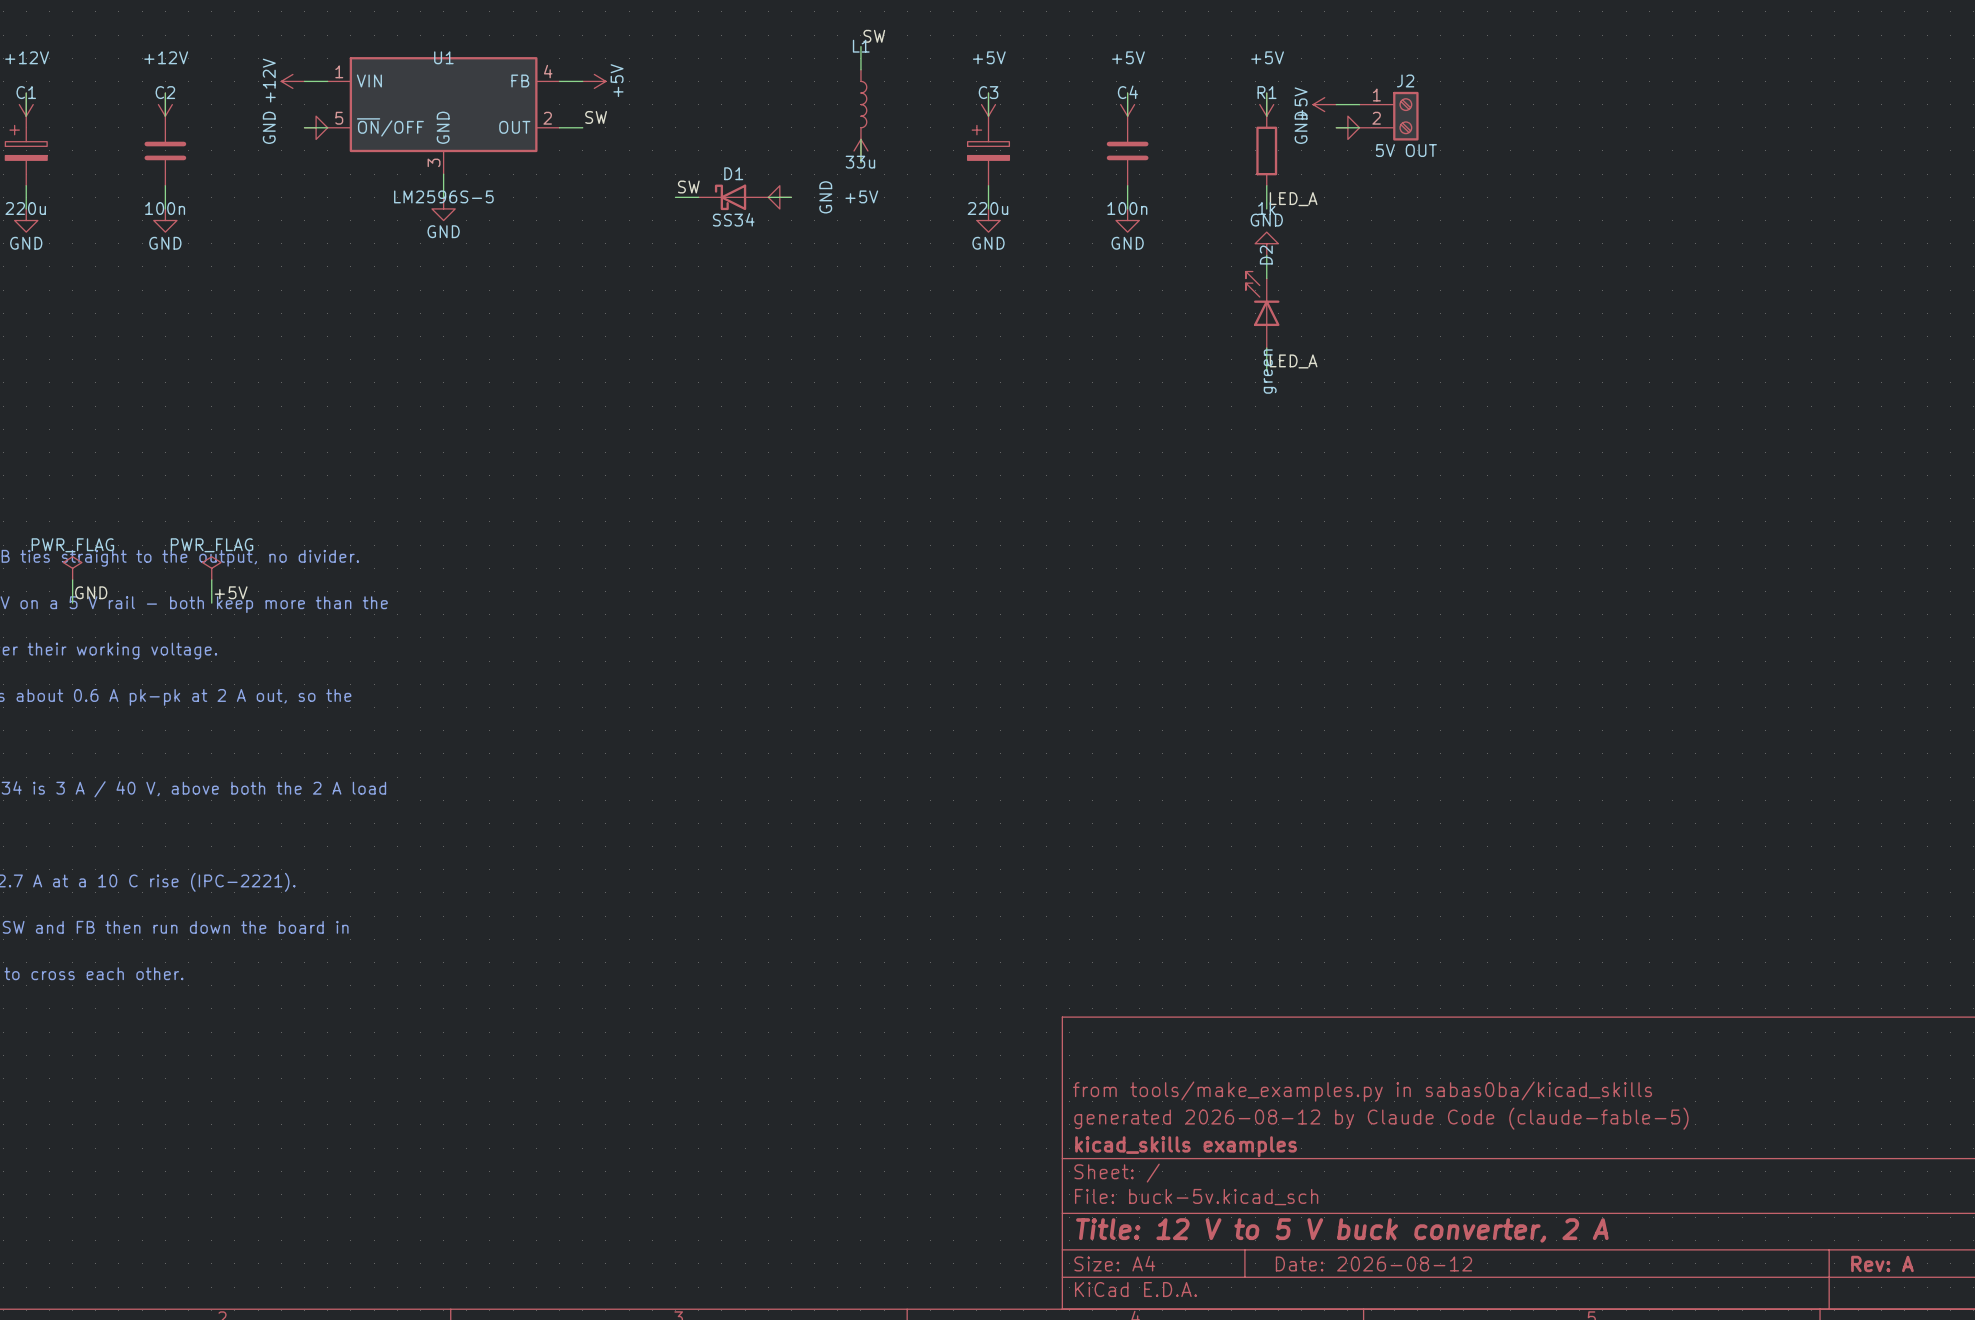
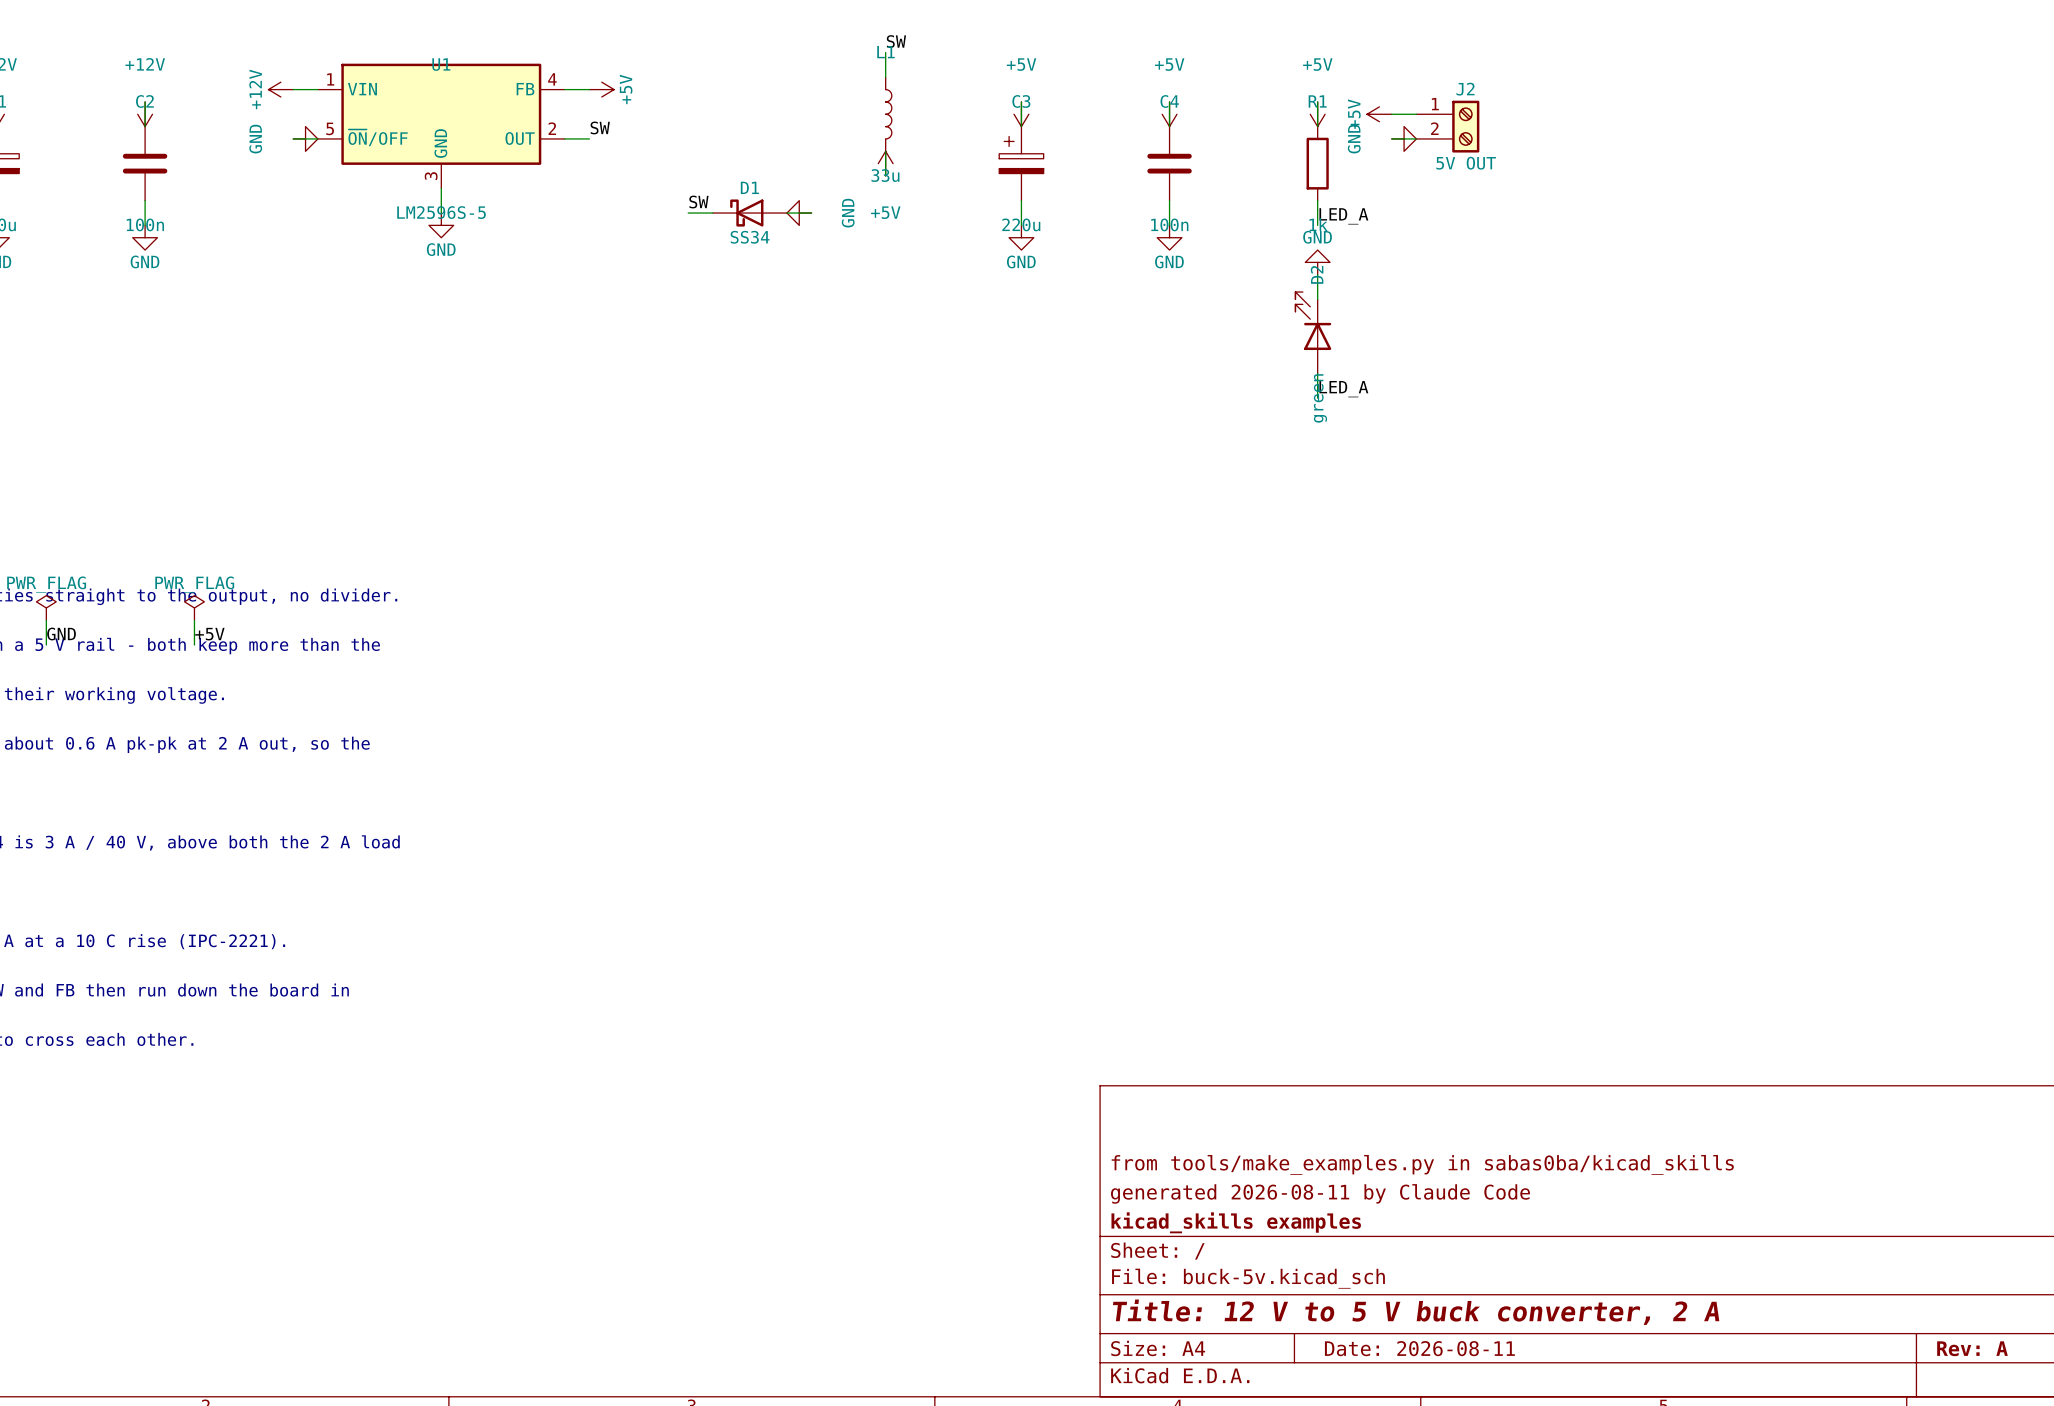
title block: generated 2026-08-12 by Claude Code (claude-fable-5) (1381, 1118) -> generated 2026-08-11 by Claude Code (1320, 1193)
title block: Date: 2026-08-12 (1373, 1263) -> Date: 2026-08-11 (1419, 1348)

